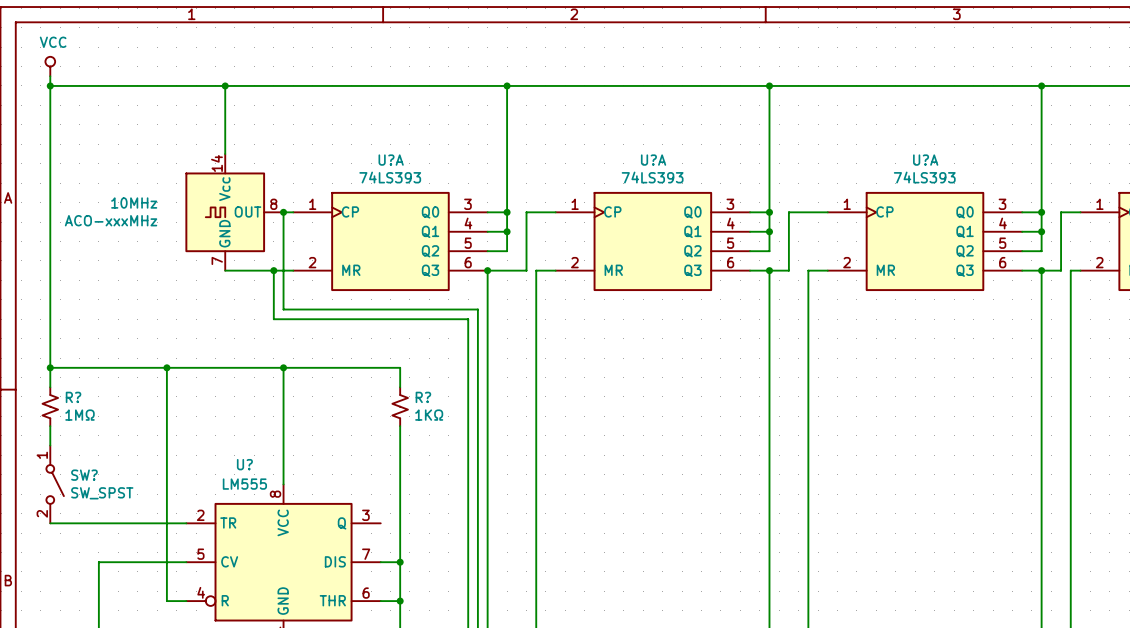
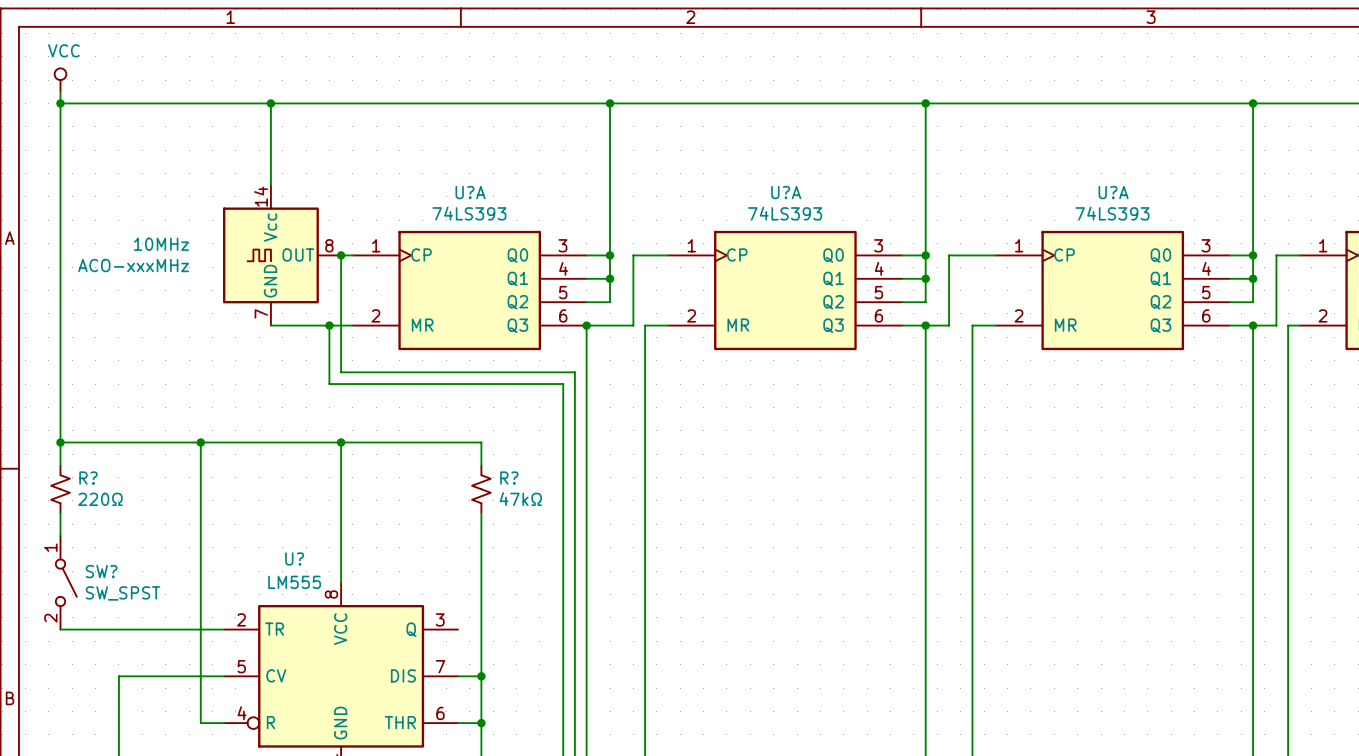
R? value: 1MΩ (80, 415) -> 220Ω (100, 499)
R? value: 1KΩ (429, 415) -> 47kΩ (520, 499)

